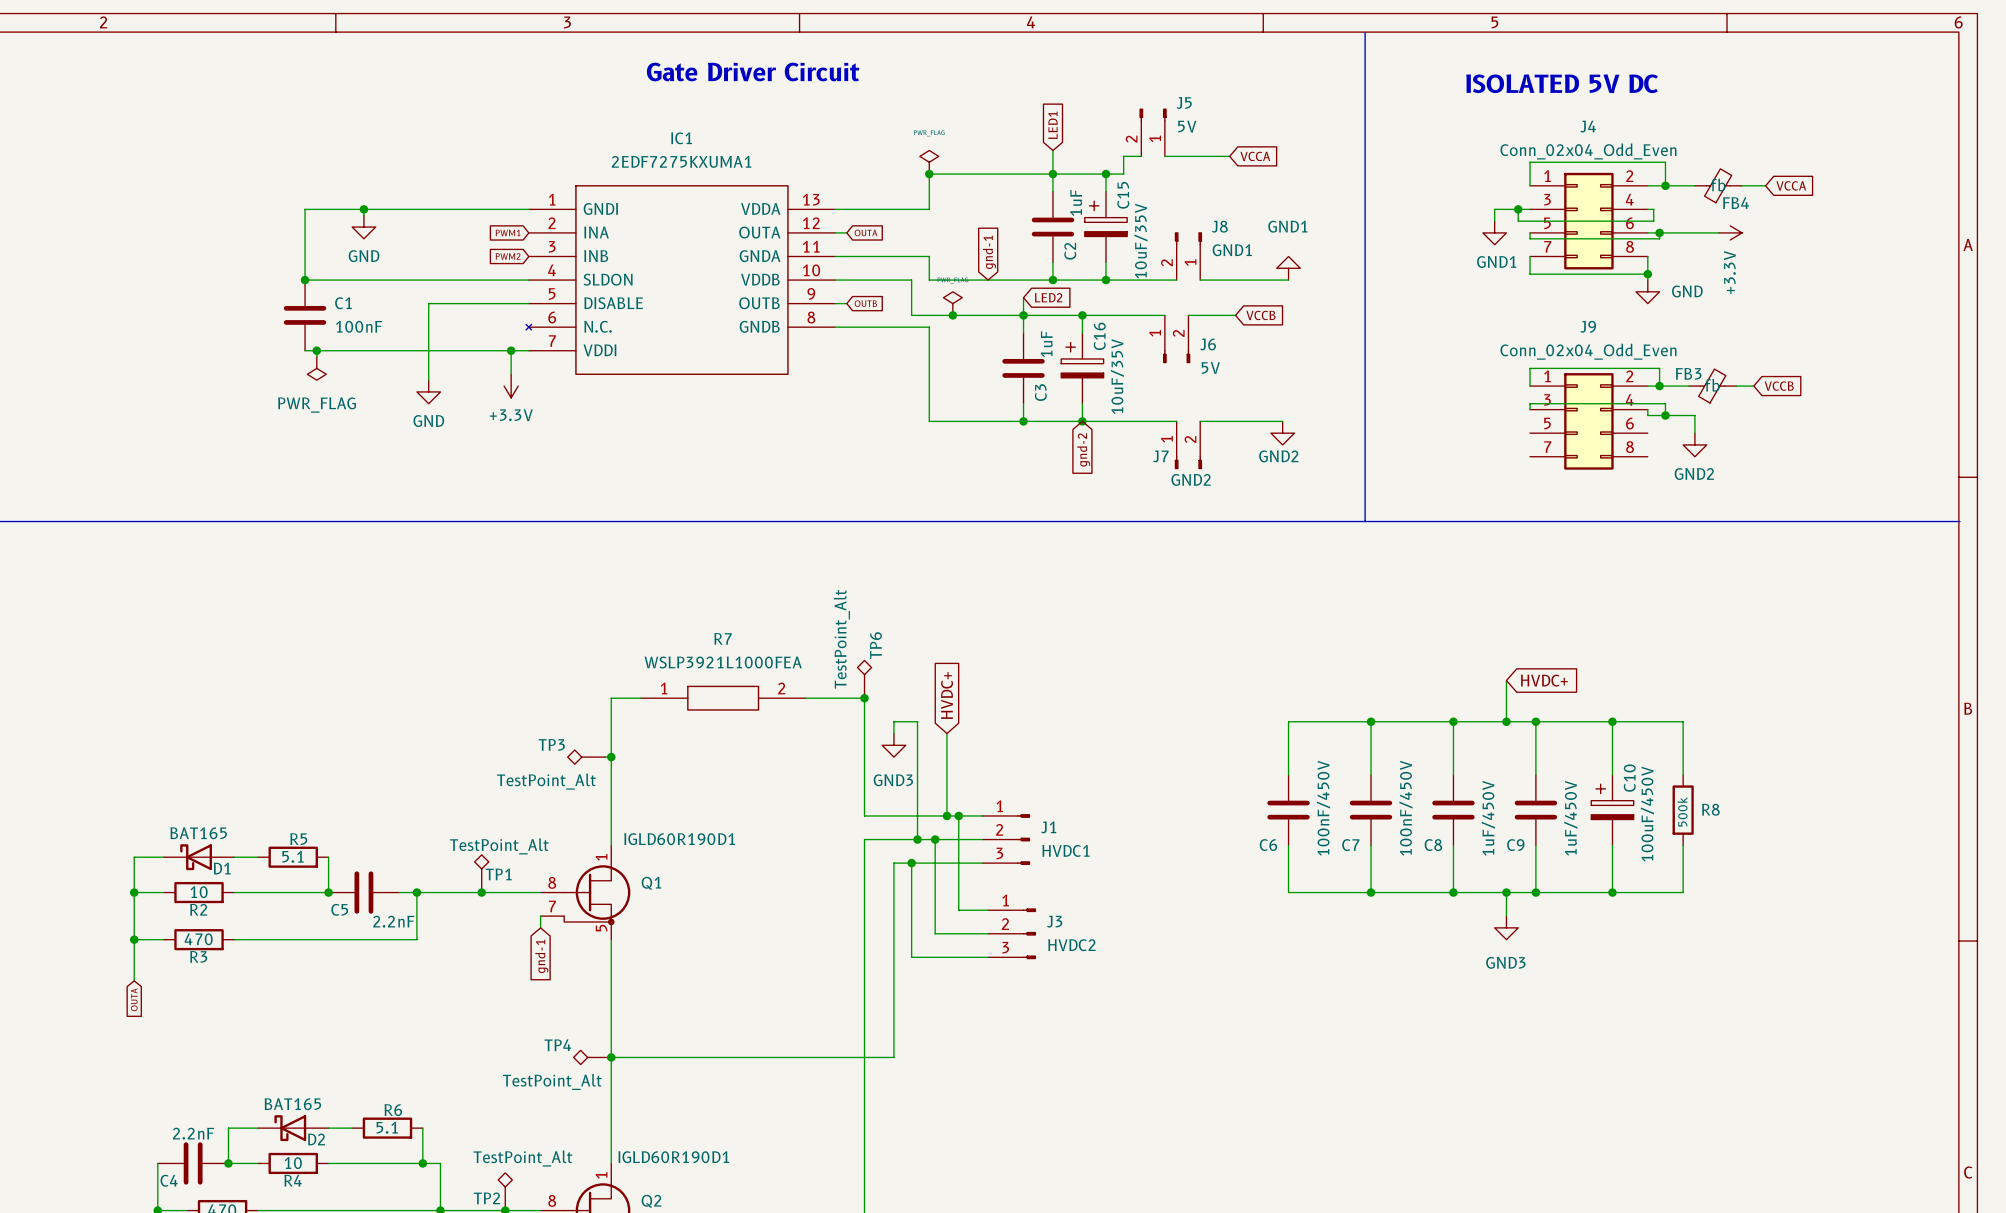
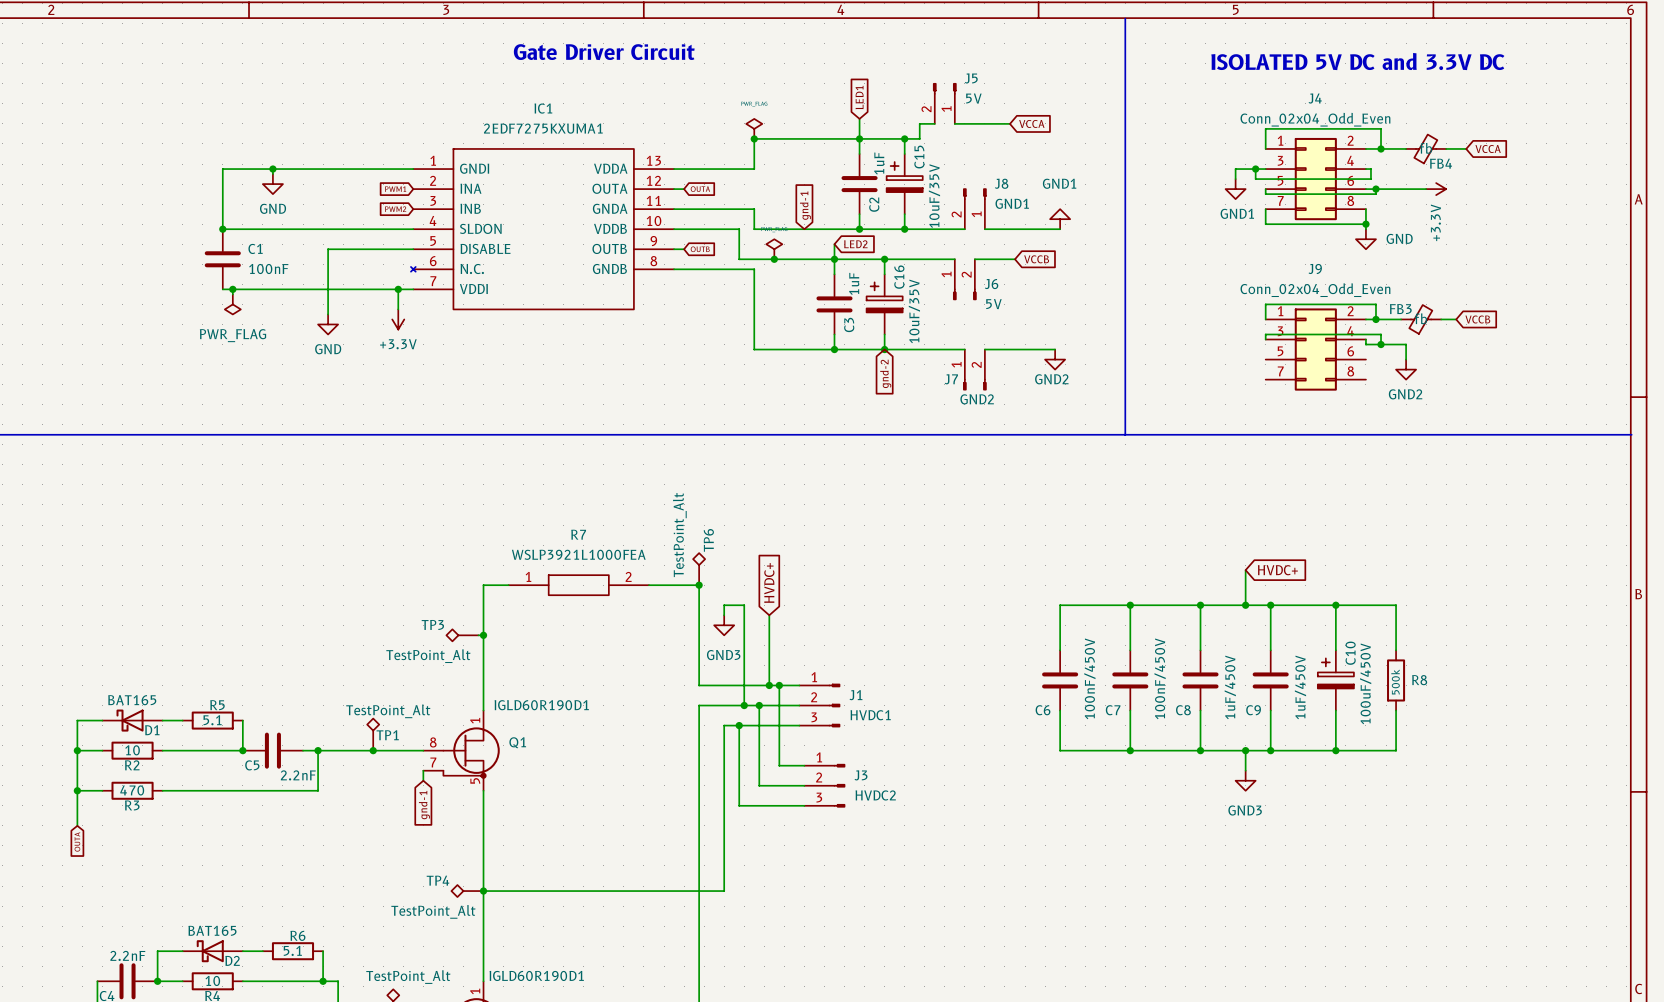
text: ISOLATED 5V DC (1562, 83) -> ISOLATED 5V DC and 3.3V DC (1357, 61)

